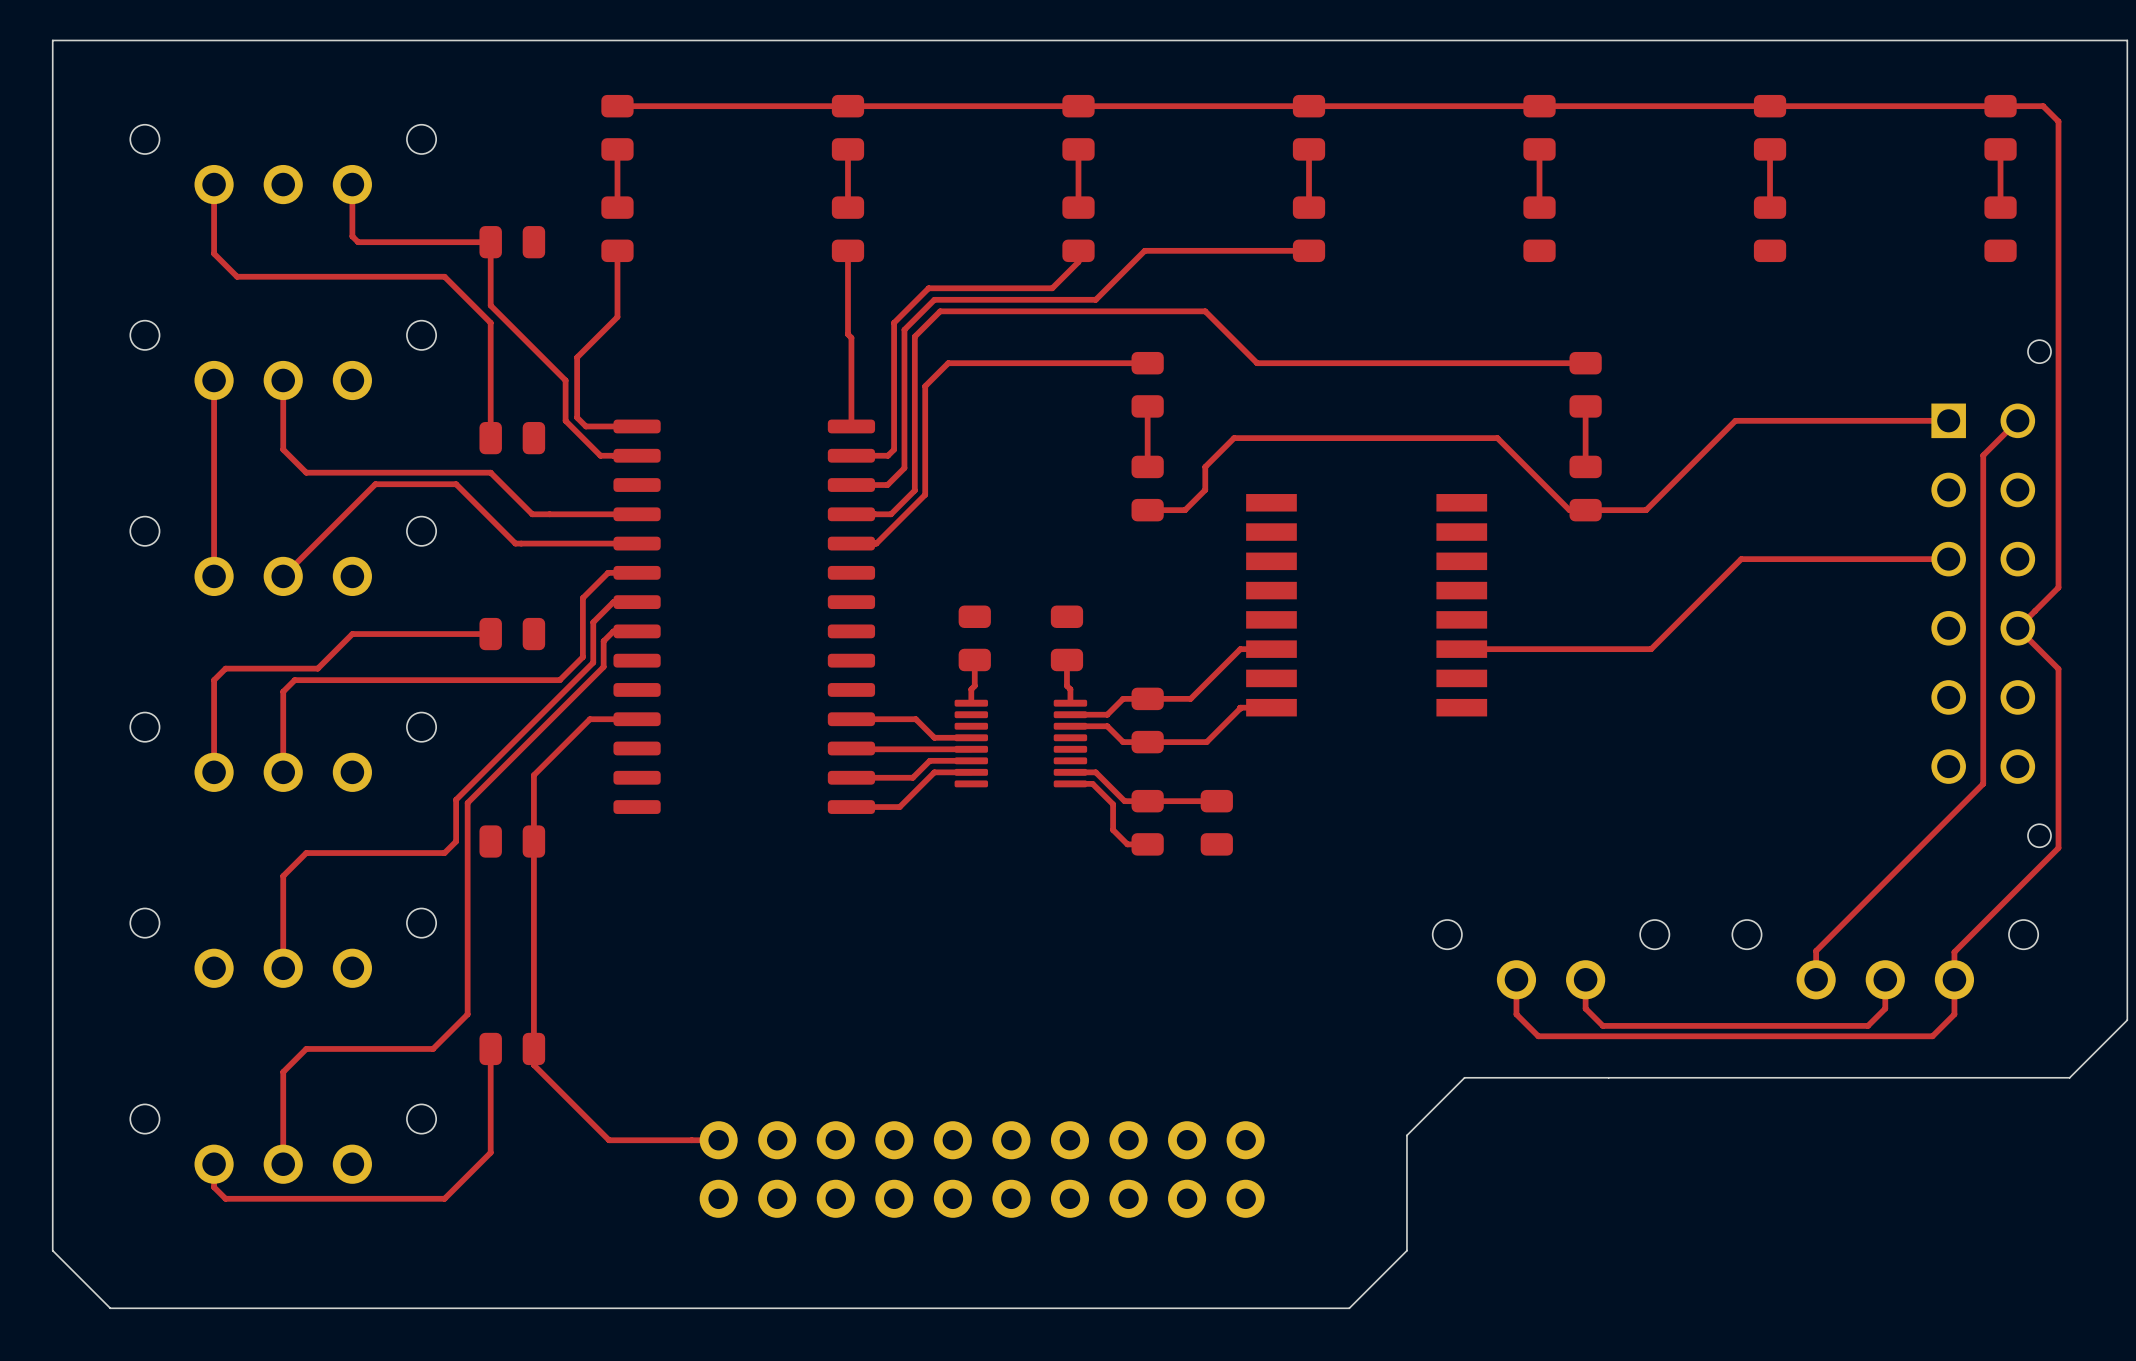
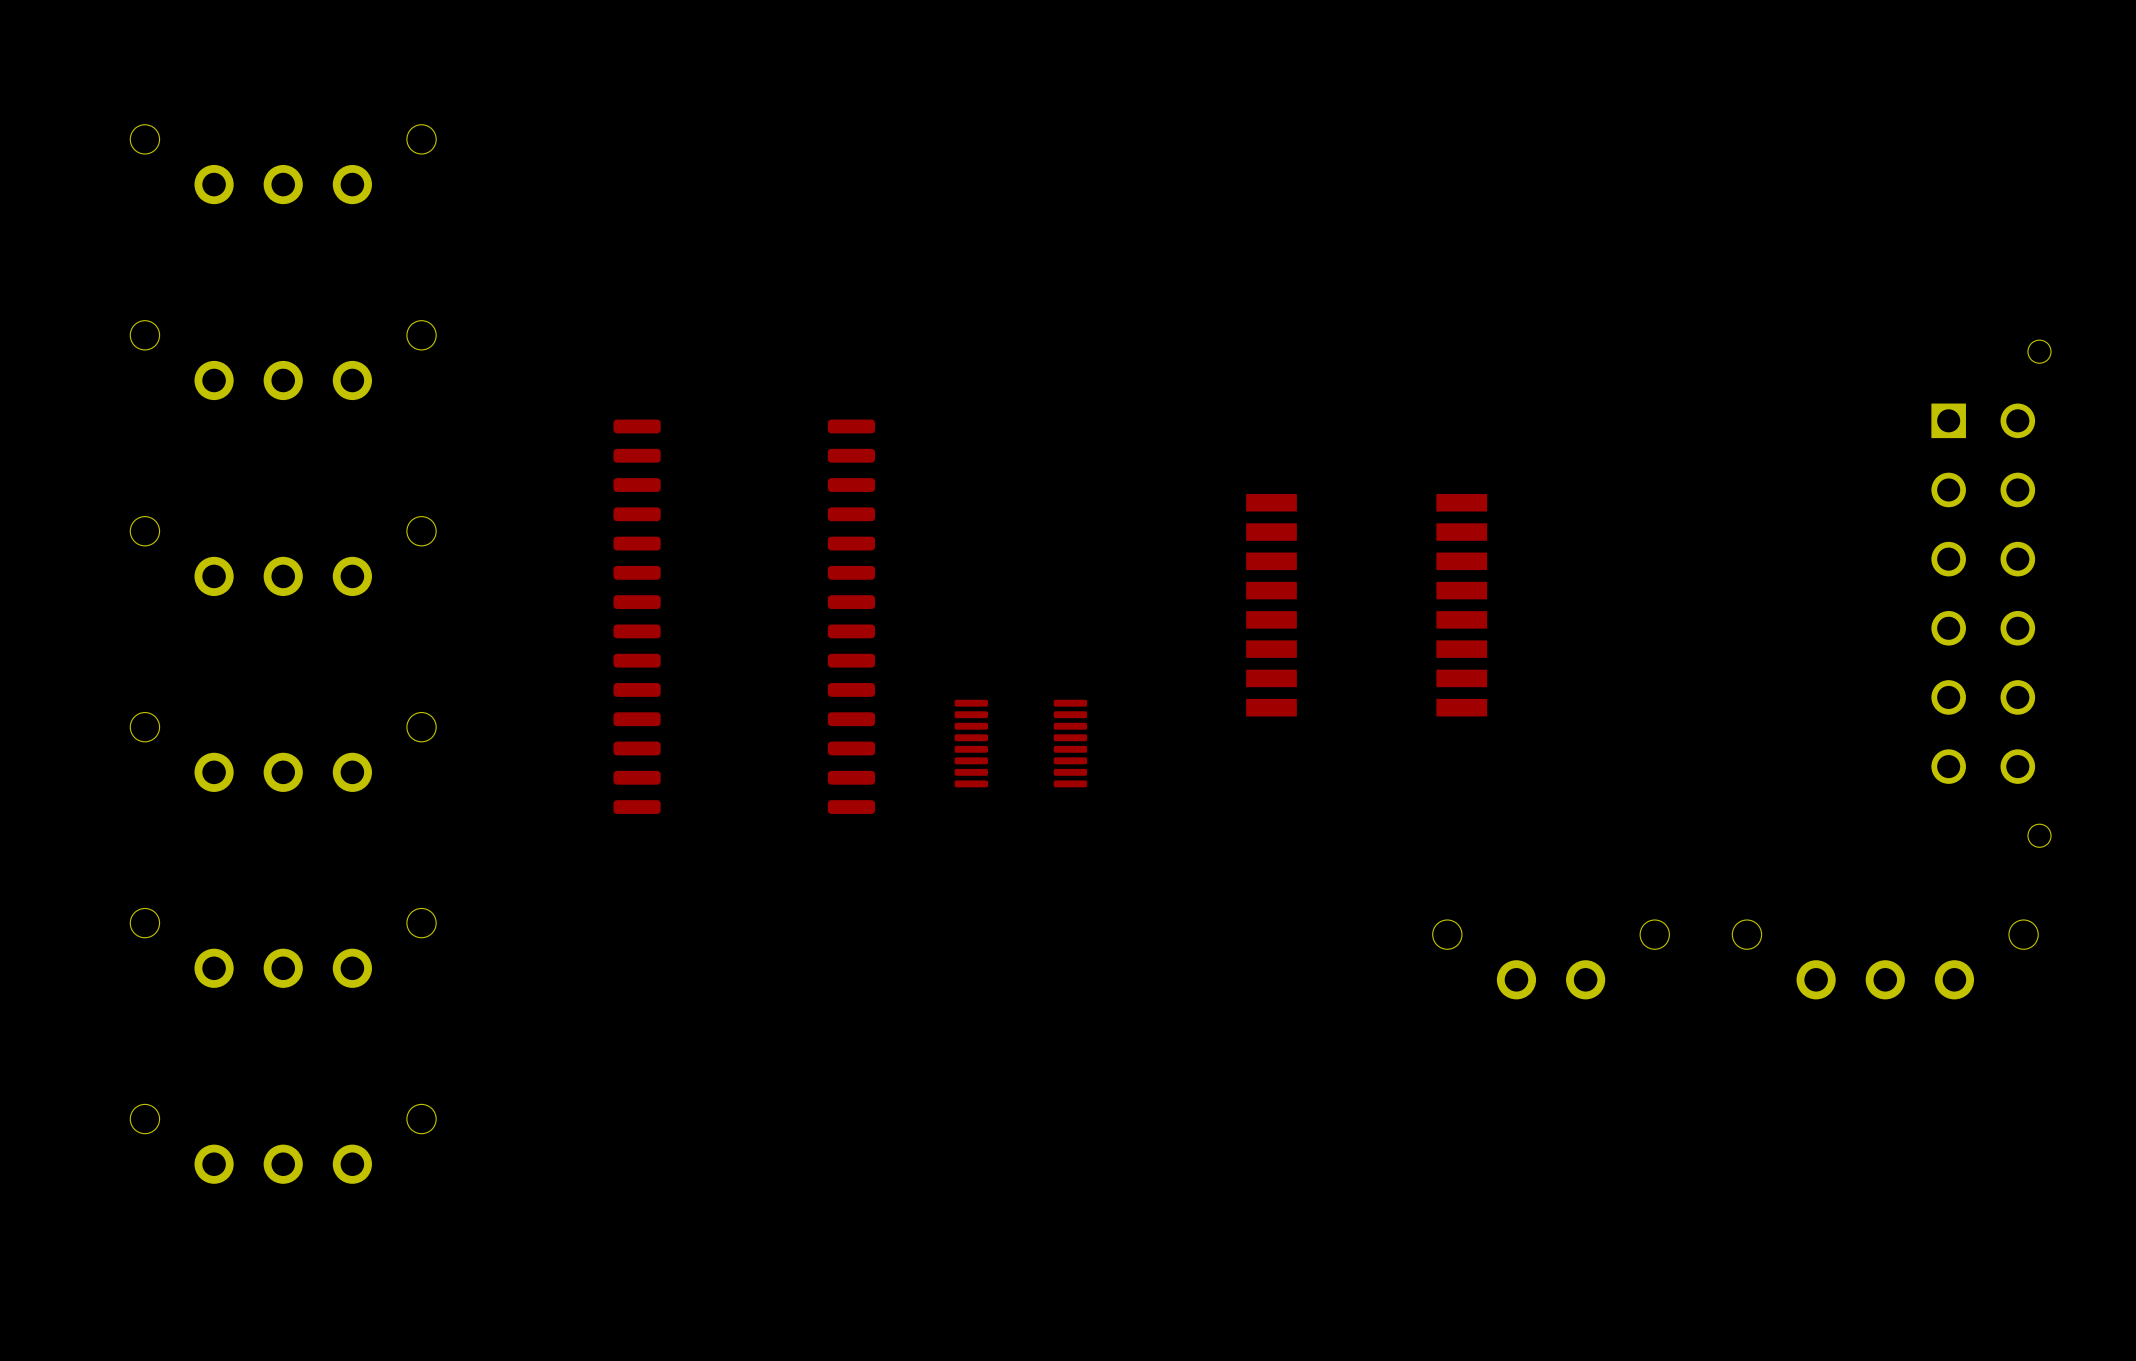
board edge: (2127, 40) (2127, 1020) (2069, 1077) (1464, 1077) (1406, 1135) (1406, 1250) (1349, 1308) (110, 1308) (52, 1250) (52, 40) (2127, 40) -> none
top track: (617, 106) (2043, 106) (2058, 121) (2058, 587) (2017, 628) (2058, 668) (2058, 848) (1954, 952) (1954, 1014) (1932, 1036) (1538, 1036) (1516, 1014) (1516, 979) -> none
part: (617, 127) -> none
part: (847, 127) -> none
part: (1078, 127) -> none
part: (1309, 127) -> none
part: (1539, 127) -> none
part: (1770, 127) -> none
part: (2000, 127) -> none
top track: (617, 149) (617, 207) -> none
top track: (847, 149) (847, 207) -> none
top track: (1078, 149) (1078, 207) -> none
top track: (1309, 149) (1309, 207) -> none
top track: (1539, 149) (1539, 207) -> none
top track: (1770, 149) (1770, 207) -> none
top track: (2000, 149) (2000, 207) -> none
top track: (214, 184) (214, 253) (237, 276) (444, 276) (490, 322) (490, 438) -> none
top track: (352, 184) (352, 236) (358, 242) (490, 242) (490, 305) (565, 380) (565, 420) (600, 455) (637, 455) -> none
part: (617, 229) -> none
part: (847, 229) -> none
part: (1078, 229) -> none
part: (1309, 229) -> none
part: (1539, 229) -> none
part: (1770, 229) -> none
part: (2000, 229) -> none
part: (512, 242) -> none
top track: (617, 250) (617, 317) (577, 357) (577, 417) (585, 426) (637, 426) -> none
top track: (847, 250) (847, 334) (851, 337) (851, 426) -> none
top track: (1078, 250) (1078, 262) (1052, 288) (928, 288) (894, 322) (894, 449) (887, 455) (851, 455) -> none
top track: (1309, 250) (1144, 250) (1095, 299) (934, 299) (904, 329) (904, 468) (887, 485) (851, 485) -> none
top track: (1147, 363) (948, 363) (925, 386) (925, 494) (876, 543) (851, 543) -> none
top track: (1585, 363) (1257, 363) (1205, 311) (940, 311) (914, 336) (914, 490) (891, 514) (851, 514) -> none
top track: (214, 380) (214, 576) -> none
top track: (283, 380) (283, 449) (306, 472) (490, 472) (532, 514) (637, 514) -> none
part: (1147, 384) -> none
part: (1585, 384) -> none
top track: (1585, 406) (1585, 466) -> none
top track: (1147, 409) (1147, 466) -> none
top track: (1948, 420) (1735, 420) (1646, 510) (1569, 510) (1497, 438) (1234, 438) (1205, 466) (1205, 489) (1185, 510) (1147, 510) -> none
top track: (2017, 420) (1983, 455) (1983, 783) (1816, 951) (1816, 979) -> none
part: (512, 438) -> none
part: (1147, 488) -> none
part: (1585, 488) -> none
top track: (637, 543) (515, 543) (456, 484) (375, 484) (283, 576) -> none
top track: (1948, 559) (1741, 559) (1651, 649) (1461, 649) -> none
top track: (637, 572) (608, 572) (582, 598) (582, 657) (559, 680) (294, 680) (283, 691) (283, 772) -> none
top track: (637, 602) (613, 602) (593, 622) (593, 662) (456, 799) (456, 841) (444, 853) (306, 853) (283, 876) (283, 968) -> none
top track: (637, 631) (613, 631) (603, 641) (603, 666) (467, 802) (467, 1014) (433, 1048) (306, 1048) (283, 1072) (283, 1164) -> none
top track: (490, 634) (352, 634) (317, 668) (225, 668) (214, 680) (214, 772) -> none
part: (512, 634) -> none
part: (974, 638) -> none
part: (1066, 638) -> none
top track: (1271, 649) (1240, 649) (1190, 698) (1123, 698) (1107, 714) (1070, 714) -> none
top track: (974, 659) (974, 685) (971, 689) (971, 703) -> none
top track: (1066, 659) (1066, 685) (1070, 689) (1070, 703) -> none
top track: (1271, 707) (1240, 707) (1206, 742) (1123, 742) (1107, 726) (1070, 726) -> none
top track: (637, 719) (589, 719) (533, 775) (533, 1065) (609, 1140) (718, 1140) -> none
top track: (851, 719) (915, 719) (934, 737) (971, 737) -> none
part: (1147, 720) -> none
top track: (851, 748) (971, 749) -> none
top track: (971, 760) (929, 760) (912, 777) (851, 777) -> none
top track: (971, 772) (934, 772) (899, 807) (851, 807) -> none
top track: (1070, 772) (1095, 772) (1124, 801) (1216, 801) -> none
top track: (1070, 783) (1092, 783) (1113, 804) (1113, 829) (1127, 844) (1147, 844) -> none
part: (1147, 822) -> none
part: (1216, 822) -> none
part: (512, 841) -> none
top track: (1885, 979) (1885, 1008) (1867, 1025) (1602, 1025) (1585, 1008) (1585, 979) -> none
top track: (490, 1048) (490, 1152) (444, 1198) (225, 1198) (214, 1187) (214, 1164) -> none
part: (512, 1048) -> none
part: (982, 1169) -> none

